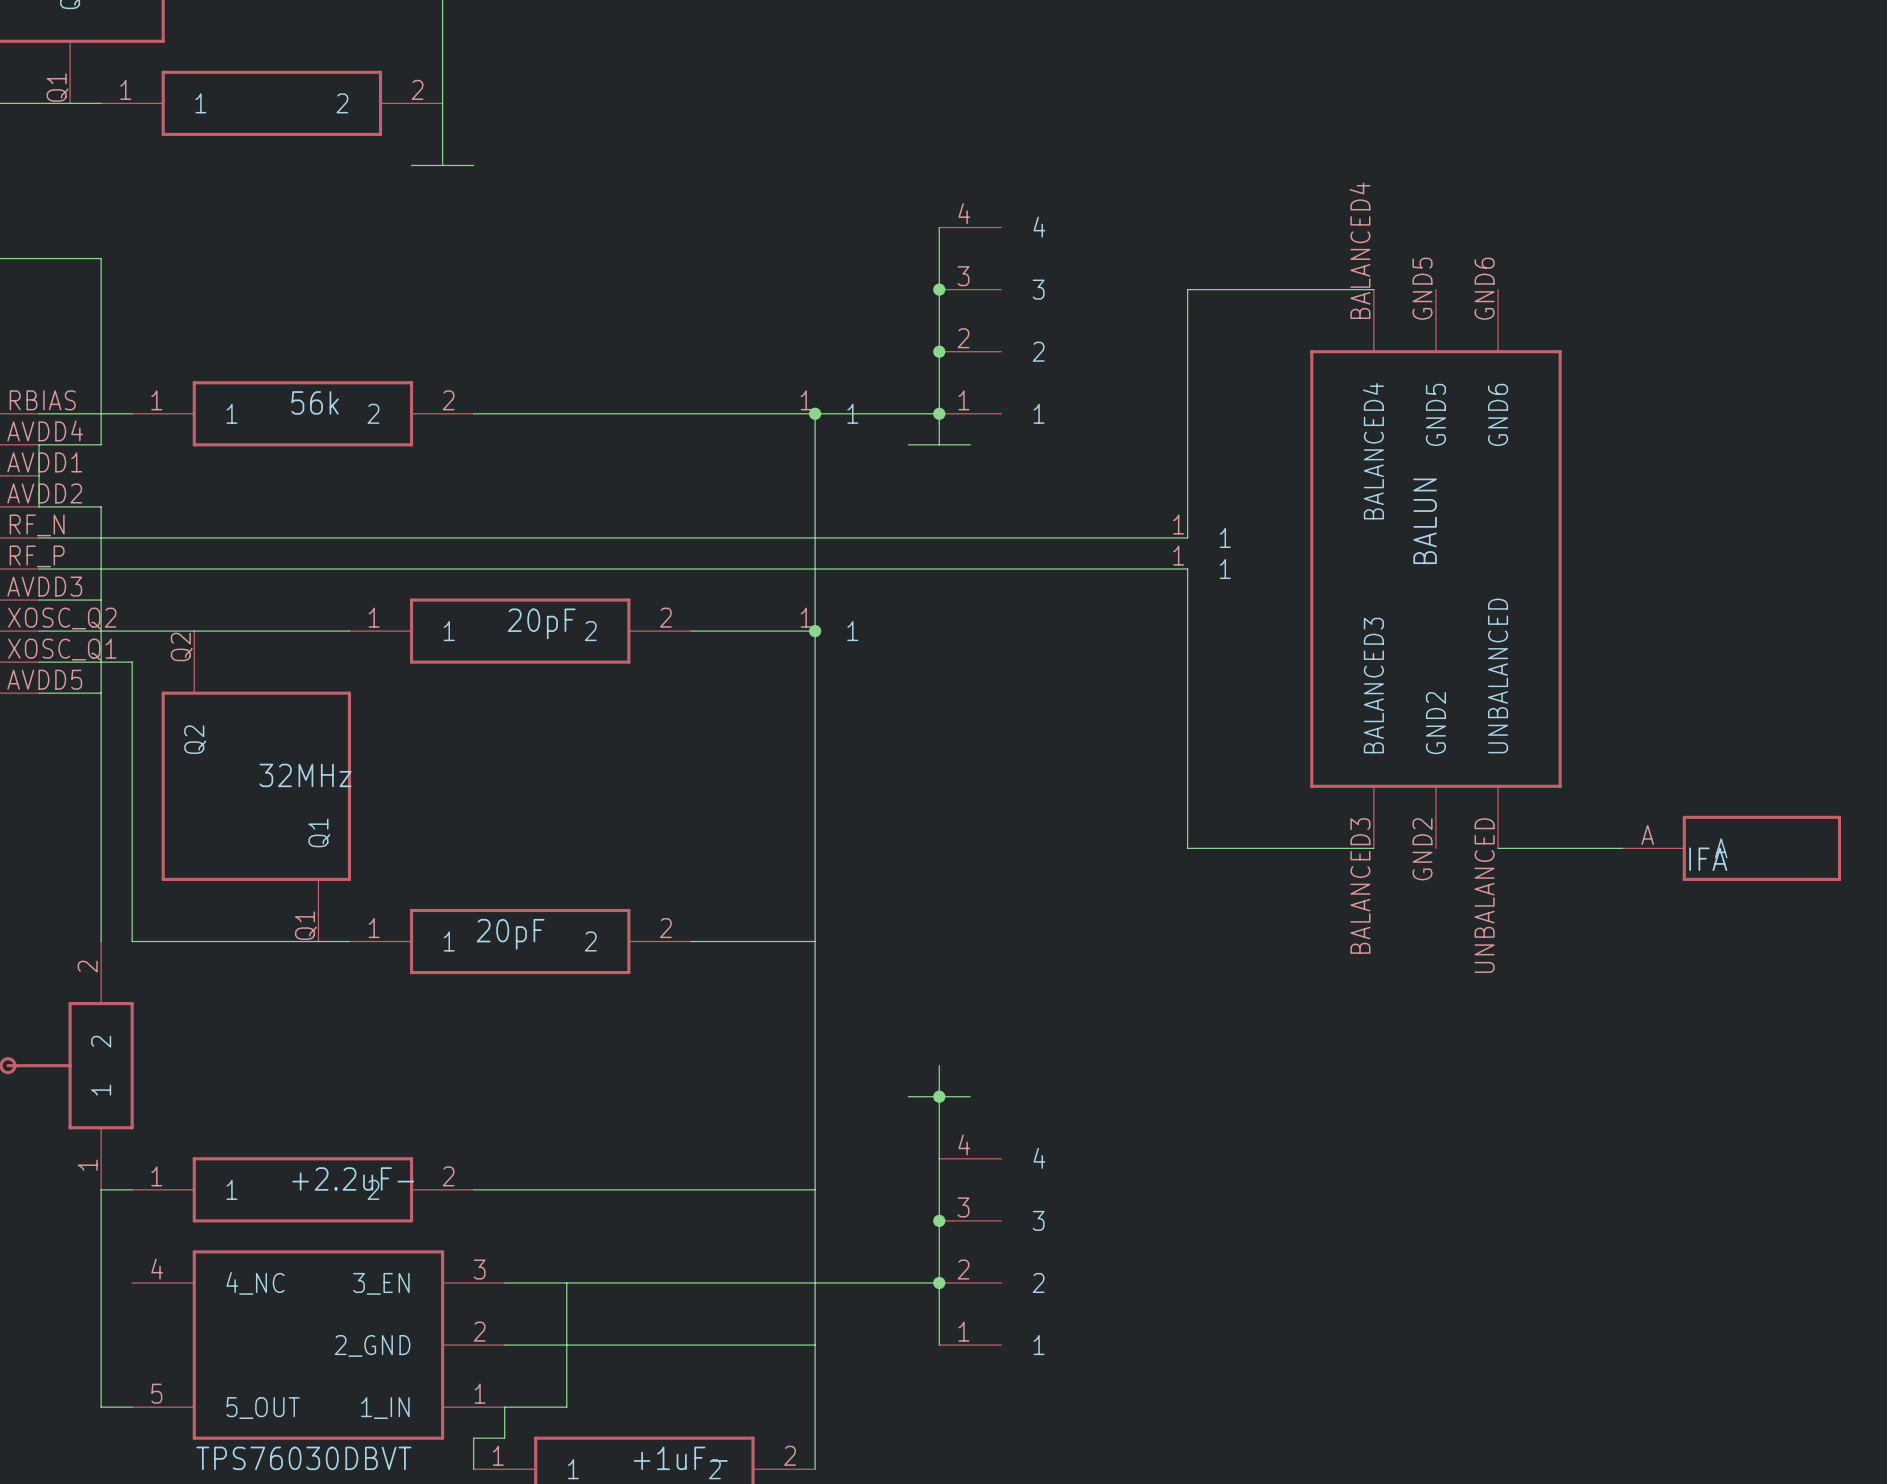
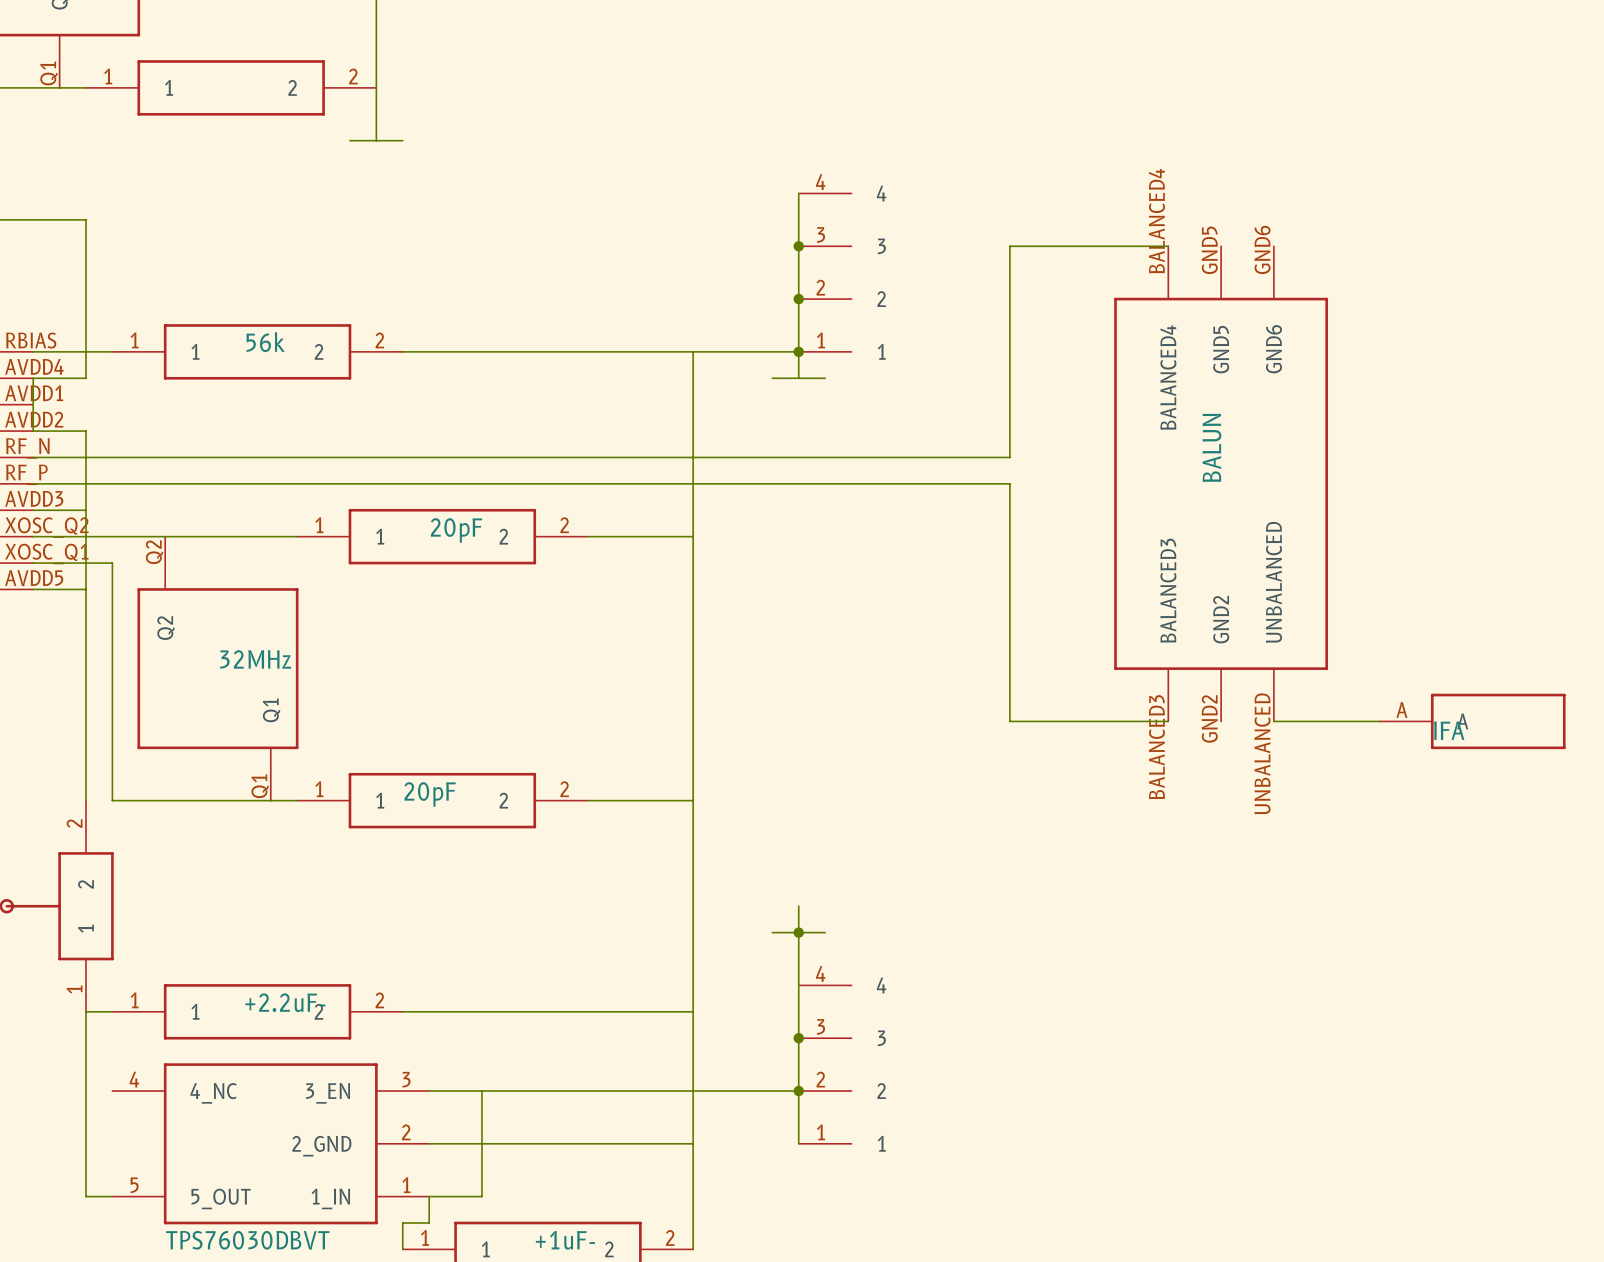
part: (829, 407) -> none
junction: (815, 413) -> none
part: (1201, 531) -> none
part: (1201, 562) -> none
part: (829, 624) -> none
junction: (815, 631) -> none

